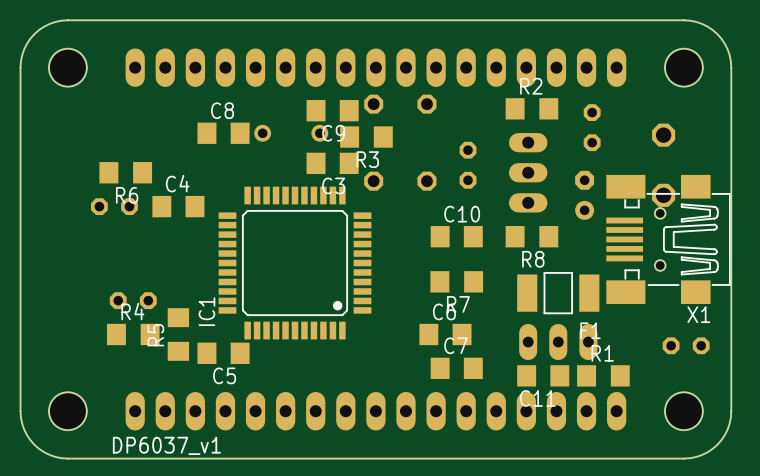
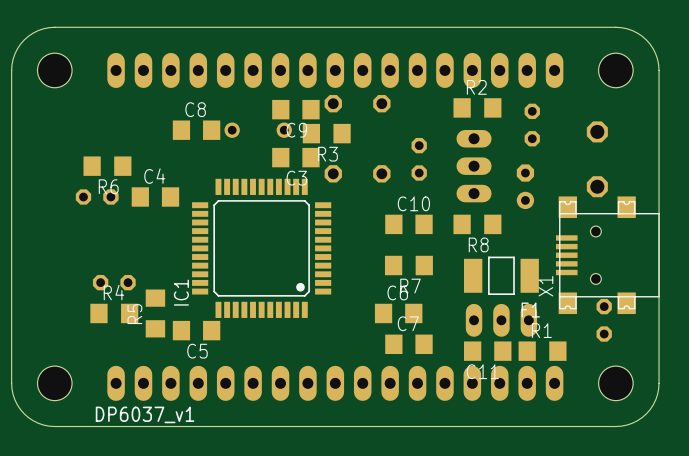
X1 footprint: [606, 174, 731, 305] -> [555, 196, 660, 315]
X1 name position: X1 (698, 314) -> X1 (545, 286)
part rotation: 0° (686, 345) -> 90° clockwise (604, 320)

